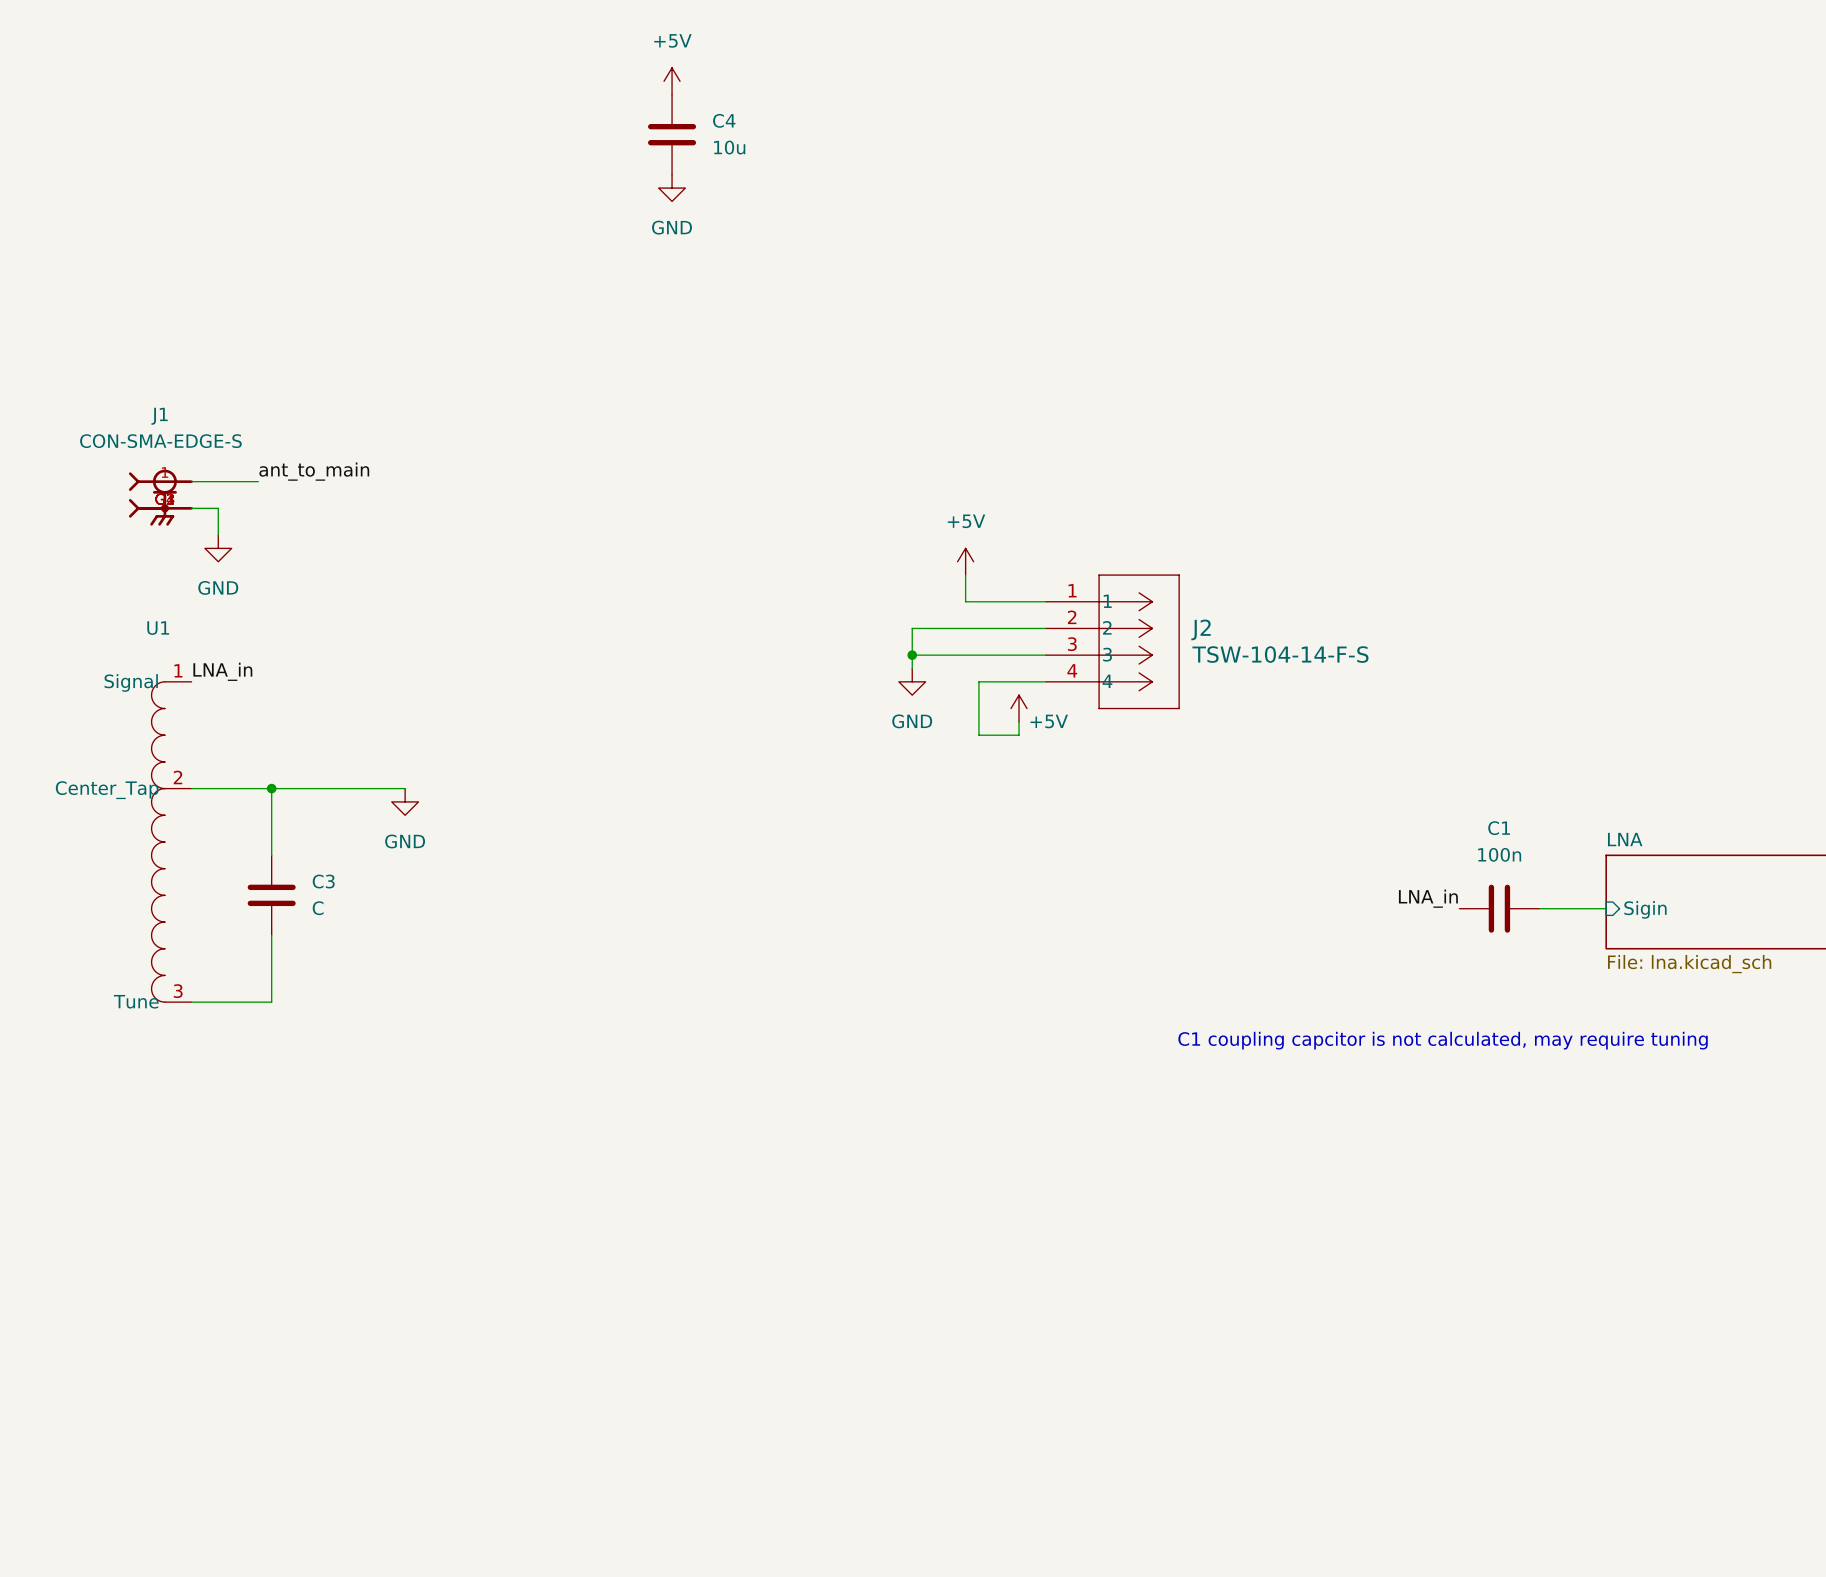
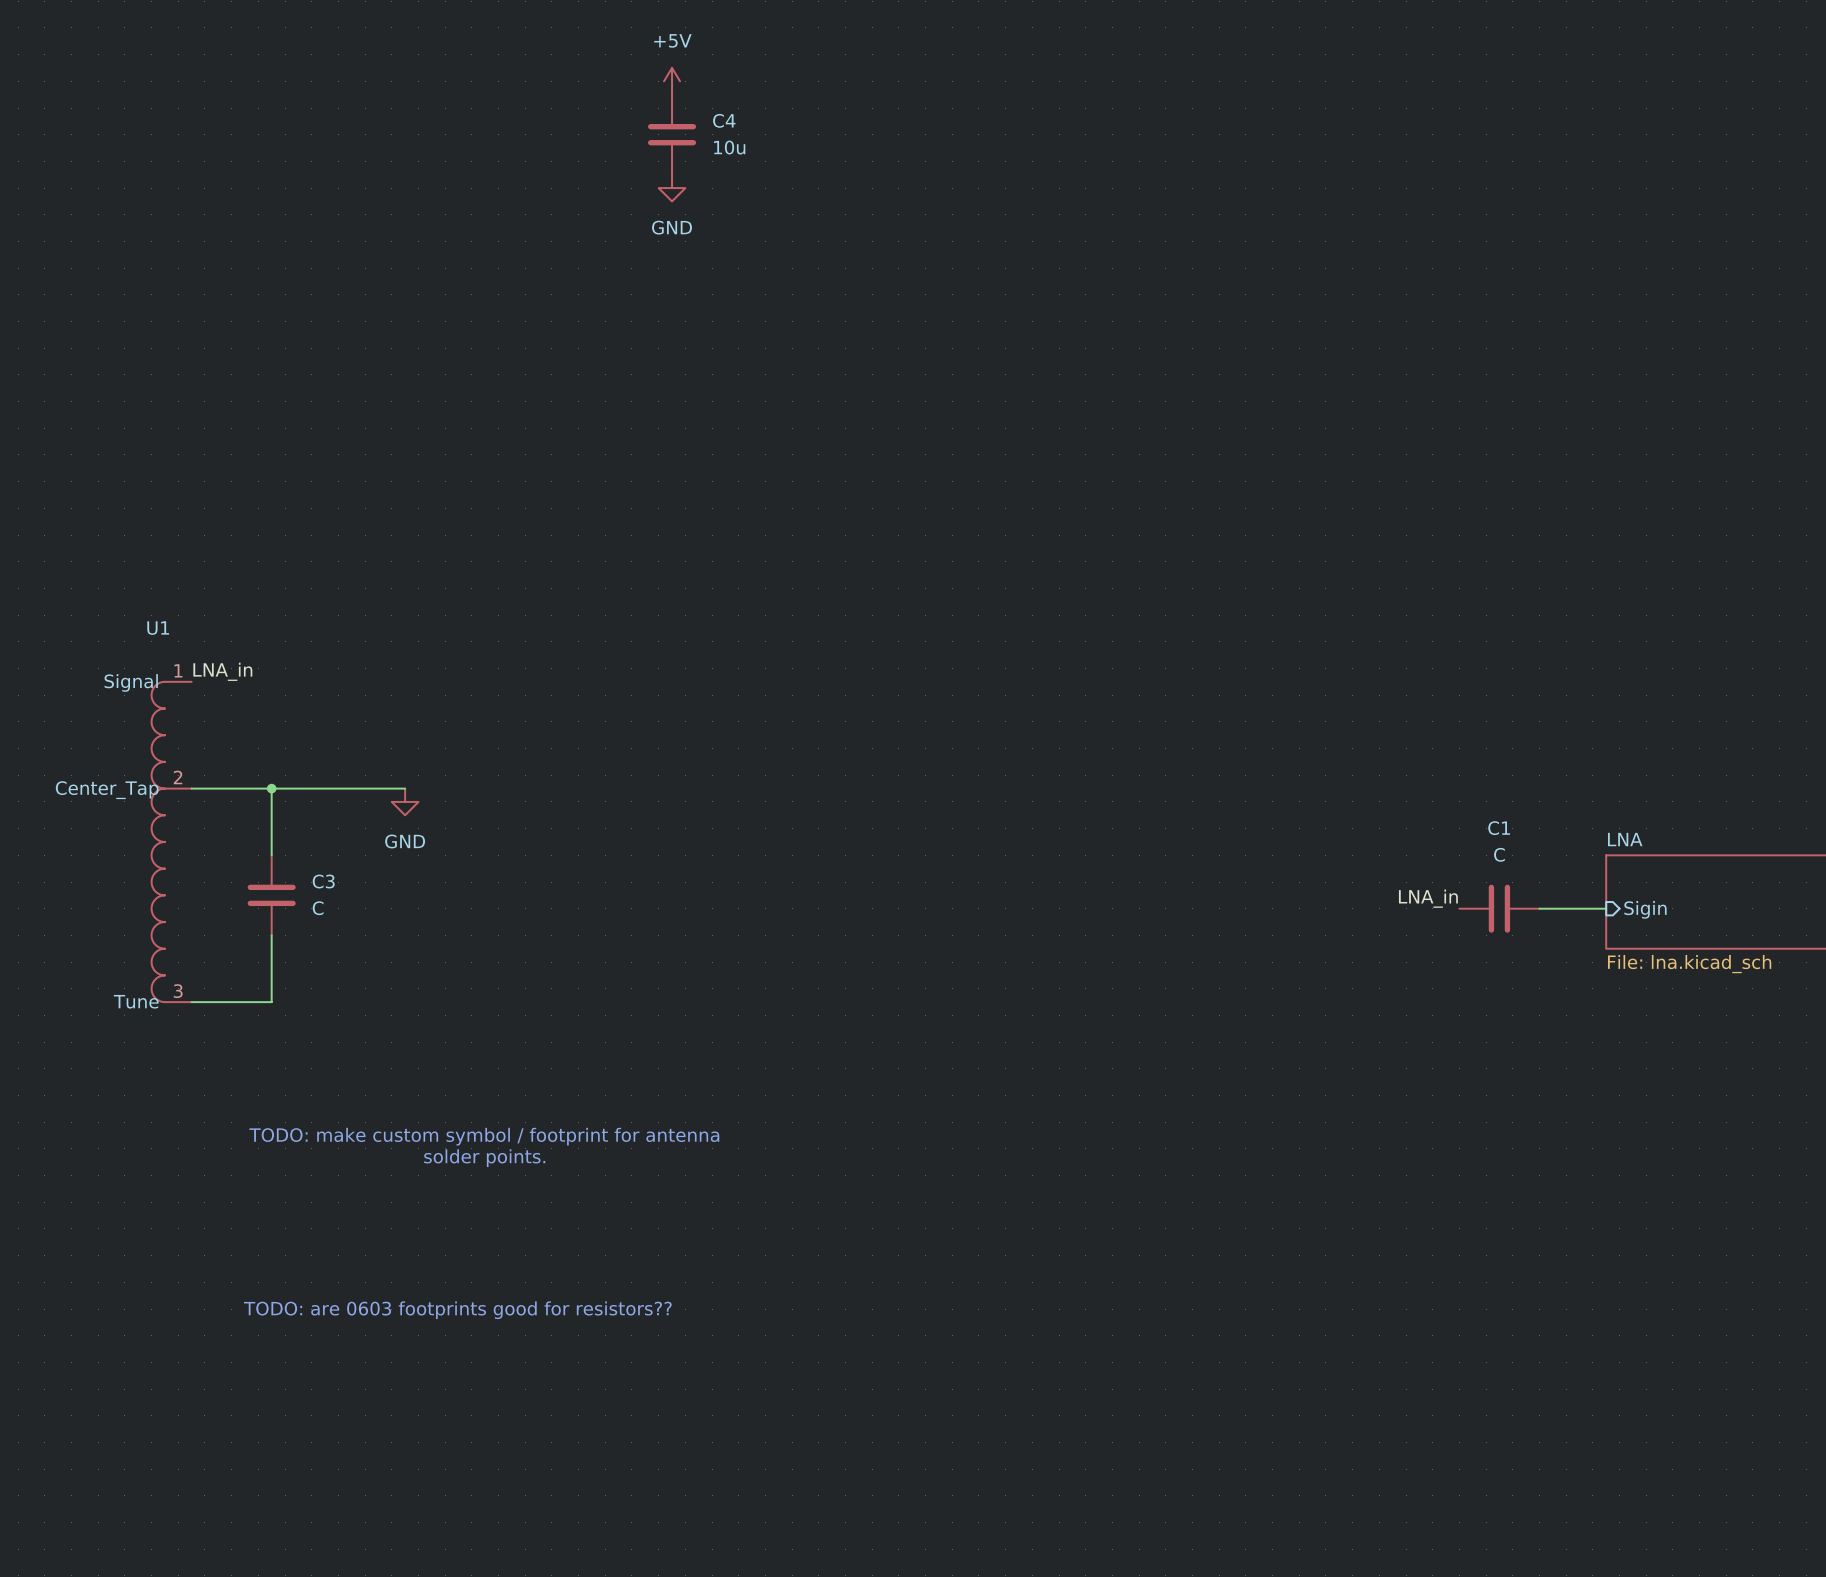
label: ant_to_main (314, 471) -> none
wire: (191, 481) (258, 481) -> none
J1: CON-SMA-EDGE-S (160, 497) -> none
wire: (191, 508) (218, 508) (218, 535) -> none
power symbol: GND (218, 548) -> none
power symbol: +5V (965, 561) -> none
wire: (965, 575) (965, 601) (1045, 601) -> none
wire: (1045, 628) (912, 628) (912, 668) -> none
J2: TSW-104-14-F-S (1112, 641) -> none
wire: (912, 655) (1045, 655) -> none
junction: (912, 655) -> none
power symbol: GND (912, 681) -> none
wire: (1045, 681) (978, 681) (978, 735) (1019, 735) (1019, 721) -> none
power symbol: +5V (1019, 708) -> none
C1 value: 100n (1499, 854) -> C (1499, 854)
text: C1 coupling capcitor is not calculated, may require tuning (1443, 1040) -> none
text: none -> TODO: make custom symbol / footprint for antenna (484, 1136)
text: none -> solder points. (484, 1158)
text: none -> TODO: are 0603 footprints good for resistors?? (457, 1310)

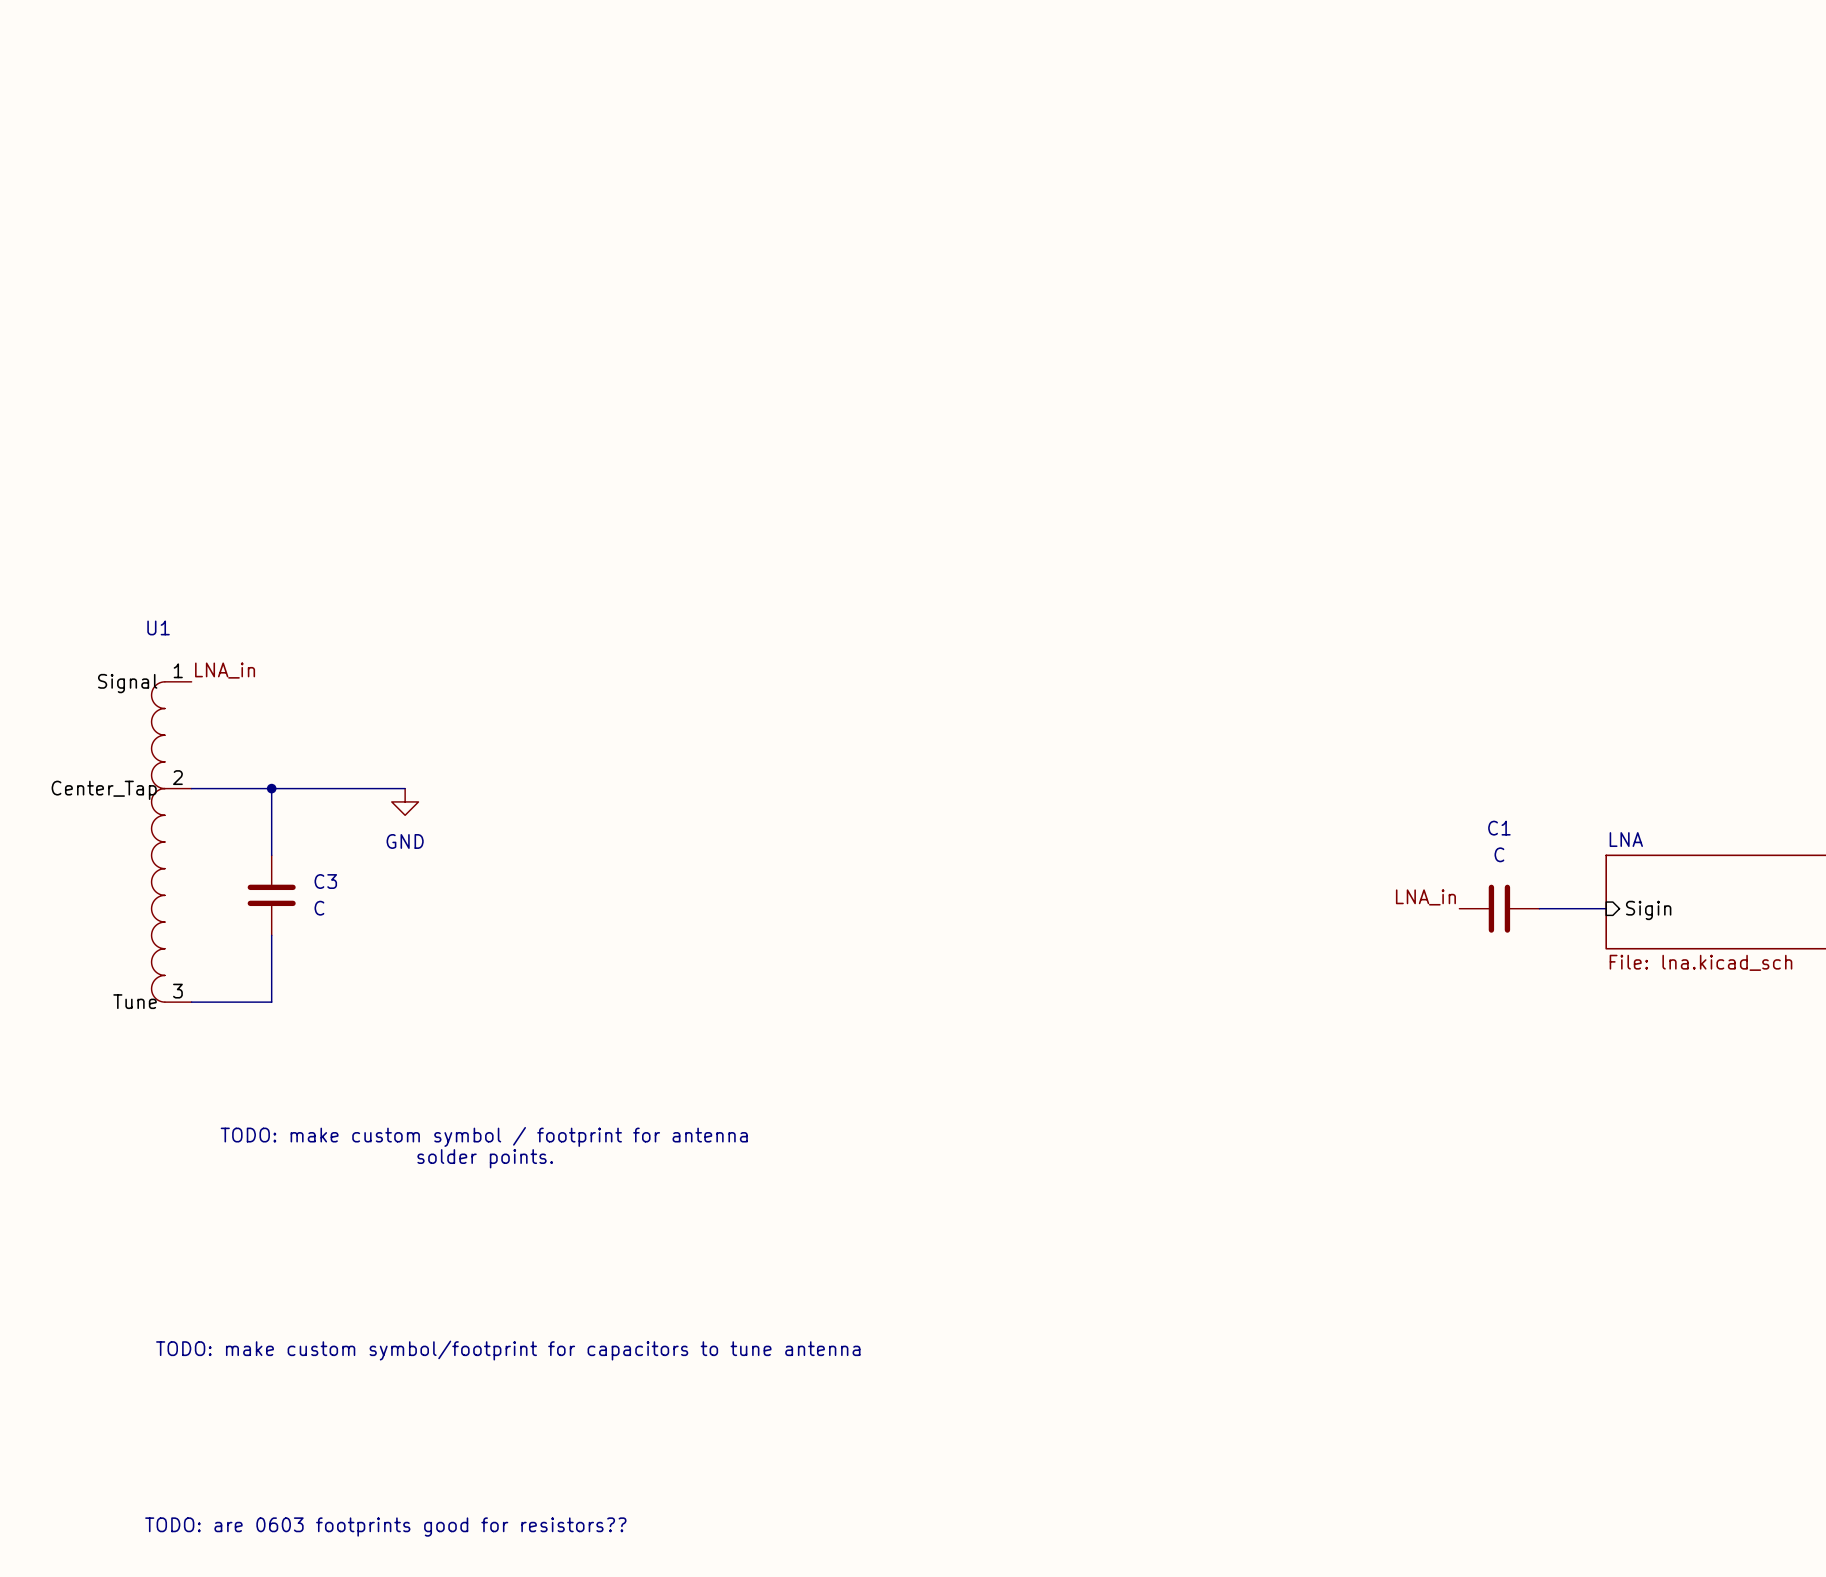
power symbol: +5V (672, 81) -> none
C4: 10u (672, 134) -> none
power symbol: GND (672, 188) -> none
text position: TODO: are 0603 footprints good for resistors?? (457, 1310) -> TODO: are 0603 footprints good for resistors?? (385, 1527)
text: none -> TODO: make custom symbol/footprint for capacitors to tune antenna (508, 1350)

